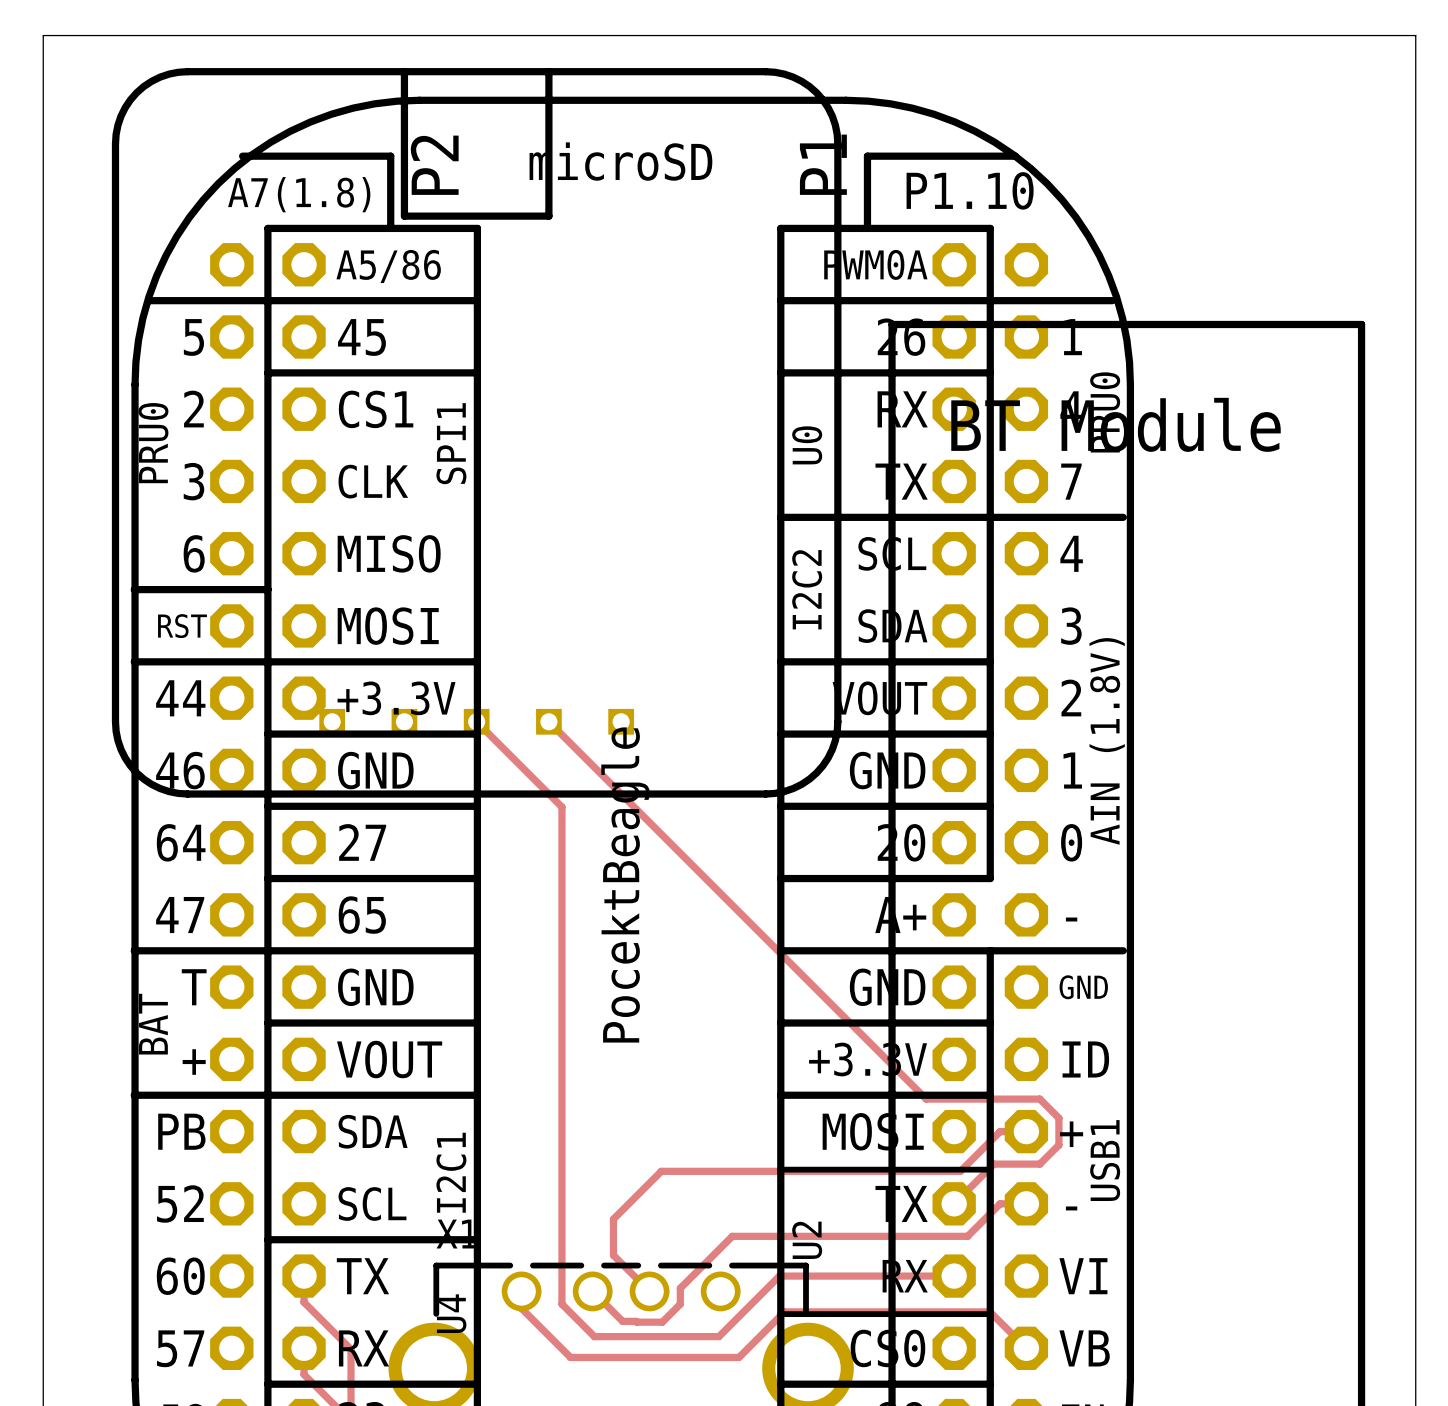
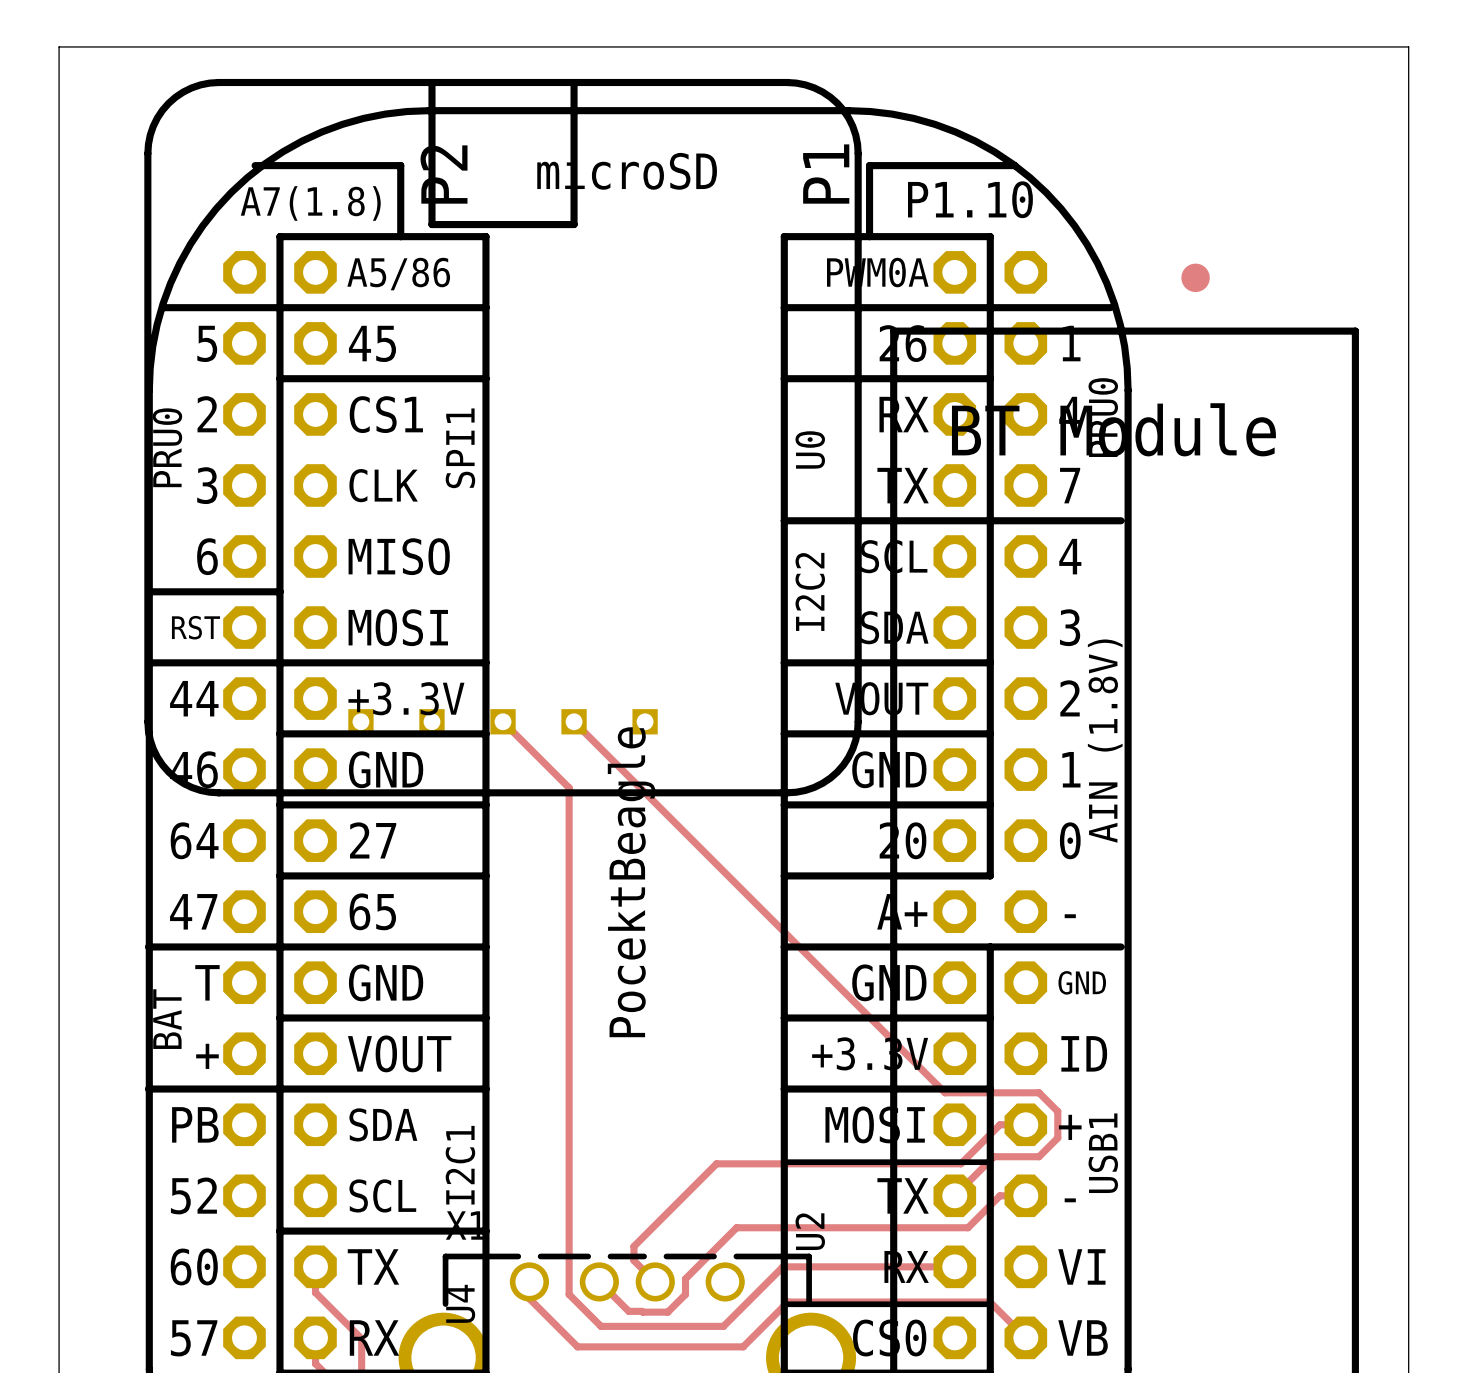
part: none -> (1195, 277)
part position: (476, 432) -> (503, 437)
track: (476, 721) (561, 807) -> (503, 721) (569, 787) (569, 805)
track: (548, 721) (926, 1099) (944, 1099) -> (574, 721) (945, 1092)
track: (711, 1171) (661, 1171) (613, 1219) (613, 1255) (627, 1269) -> (716, 1163) (633, 1246) (633, 1260)

